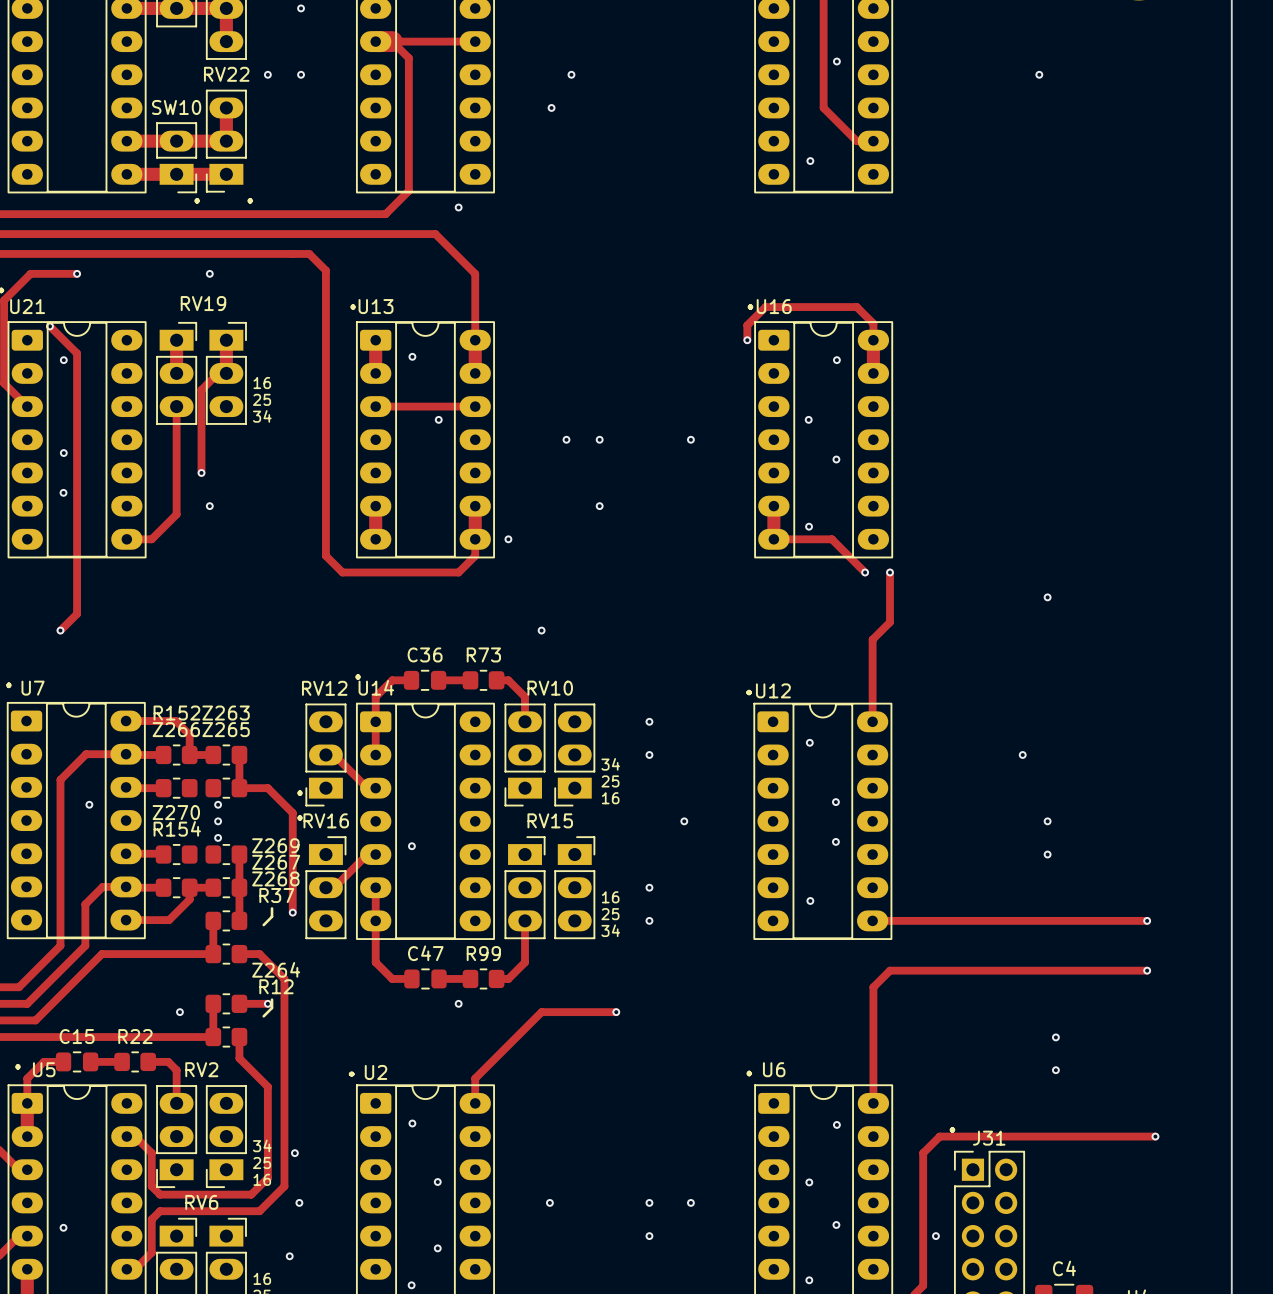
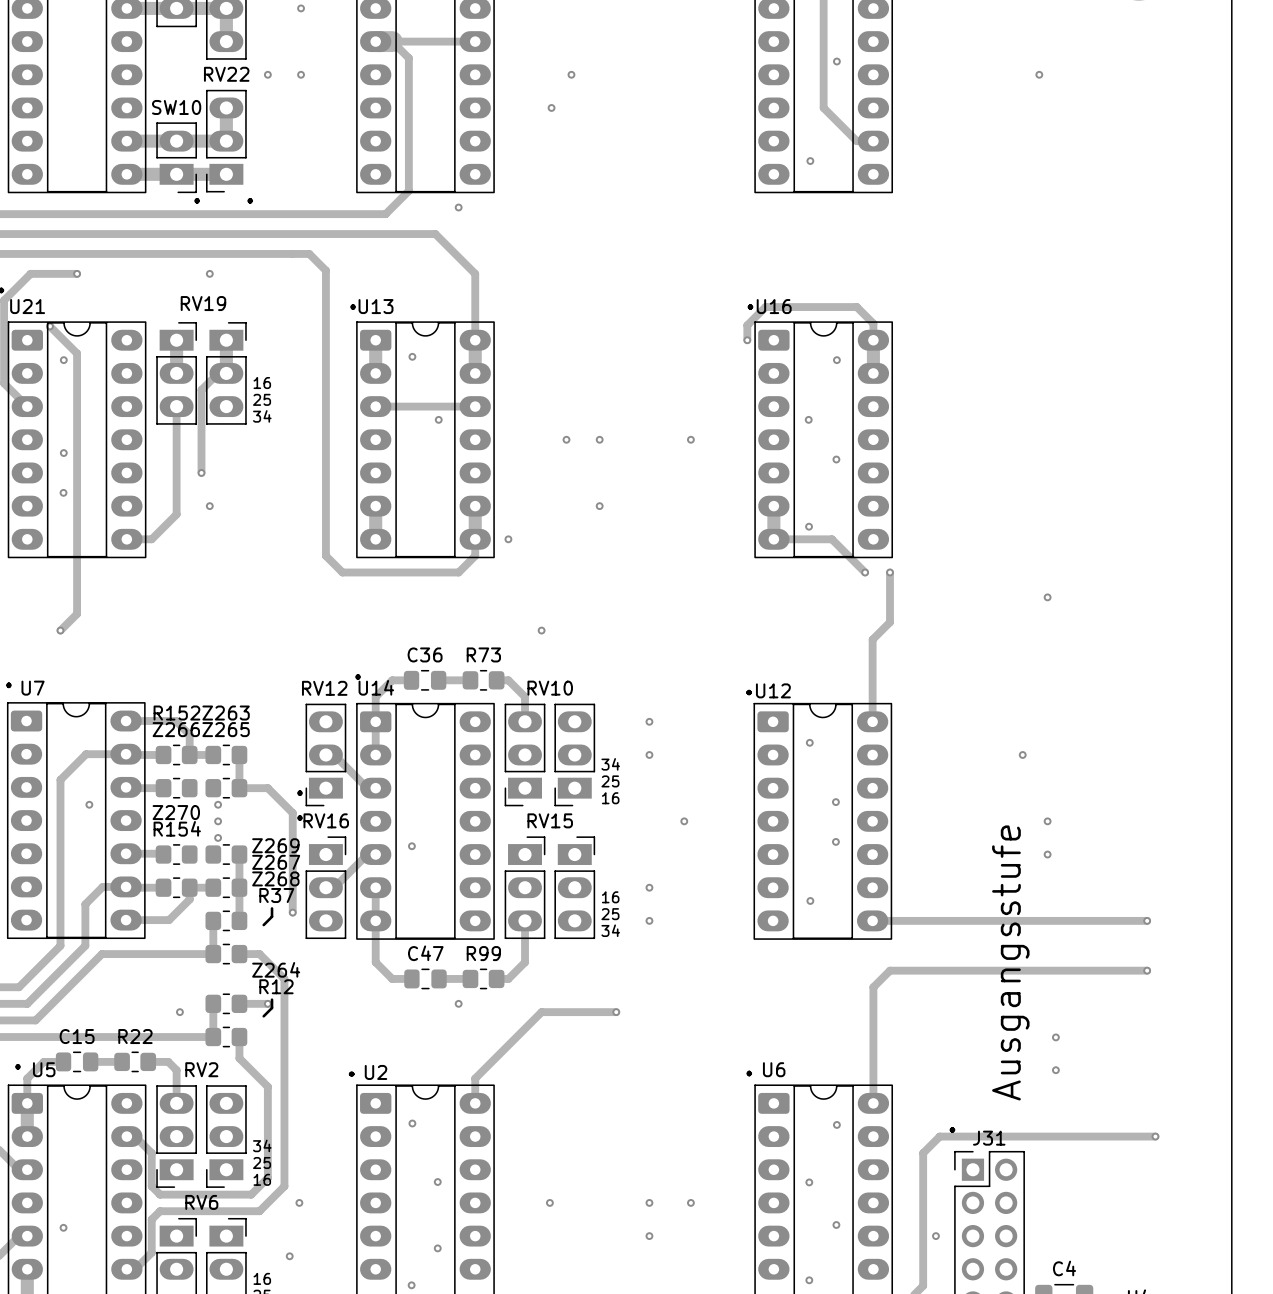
text: none -> Ausgangsstufe (1010, 962)
via: (294, 1153) -> none

